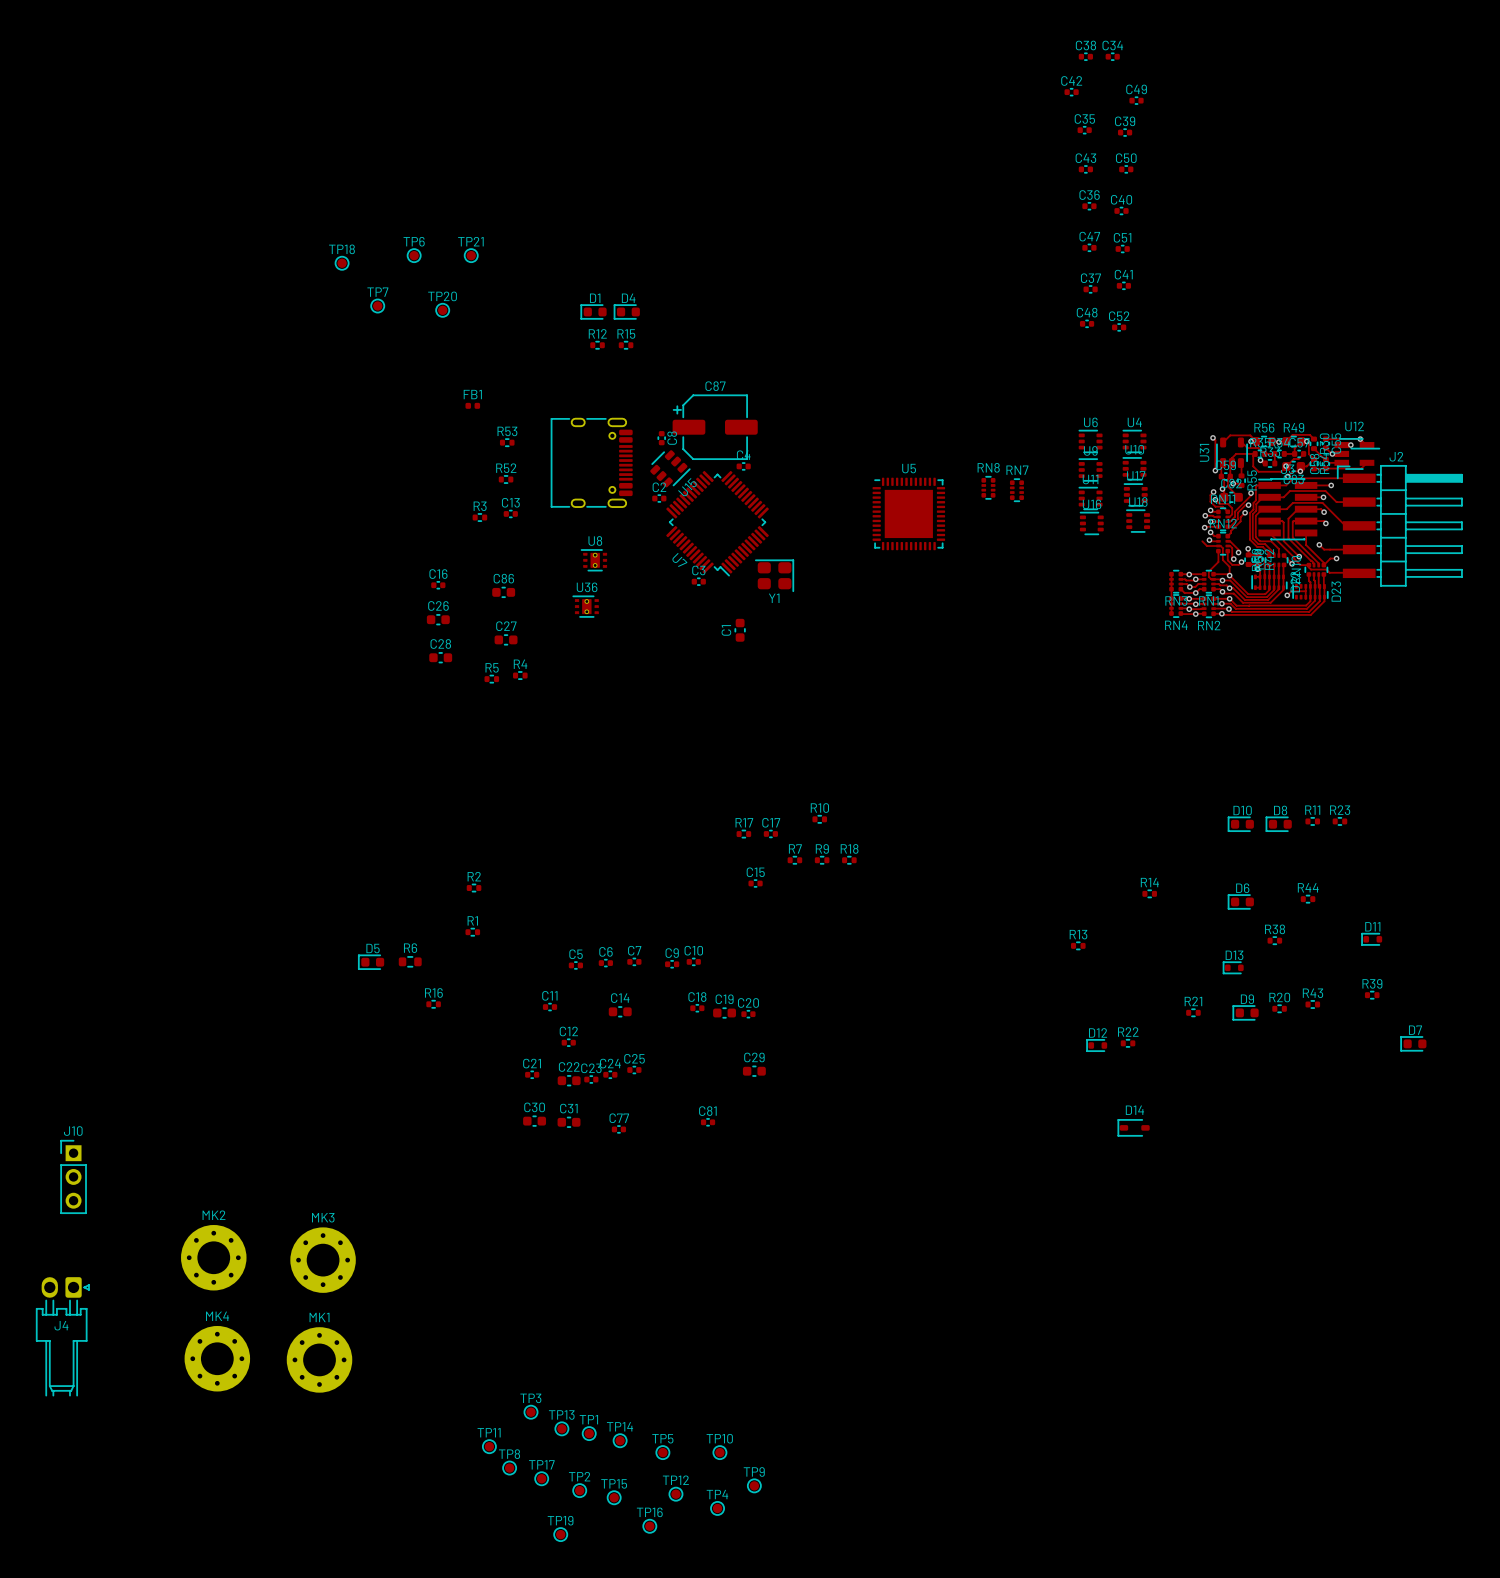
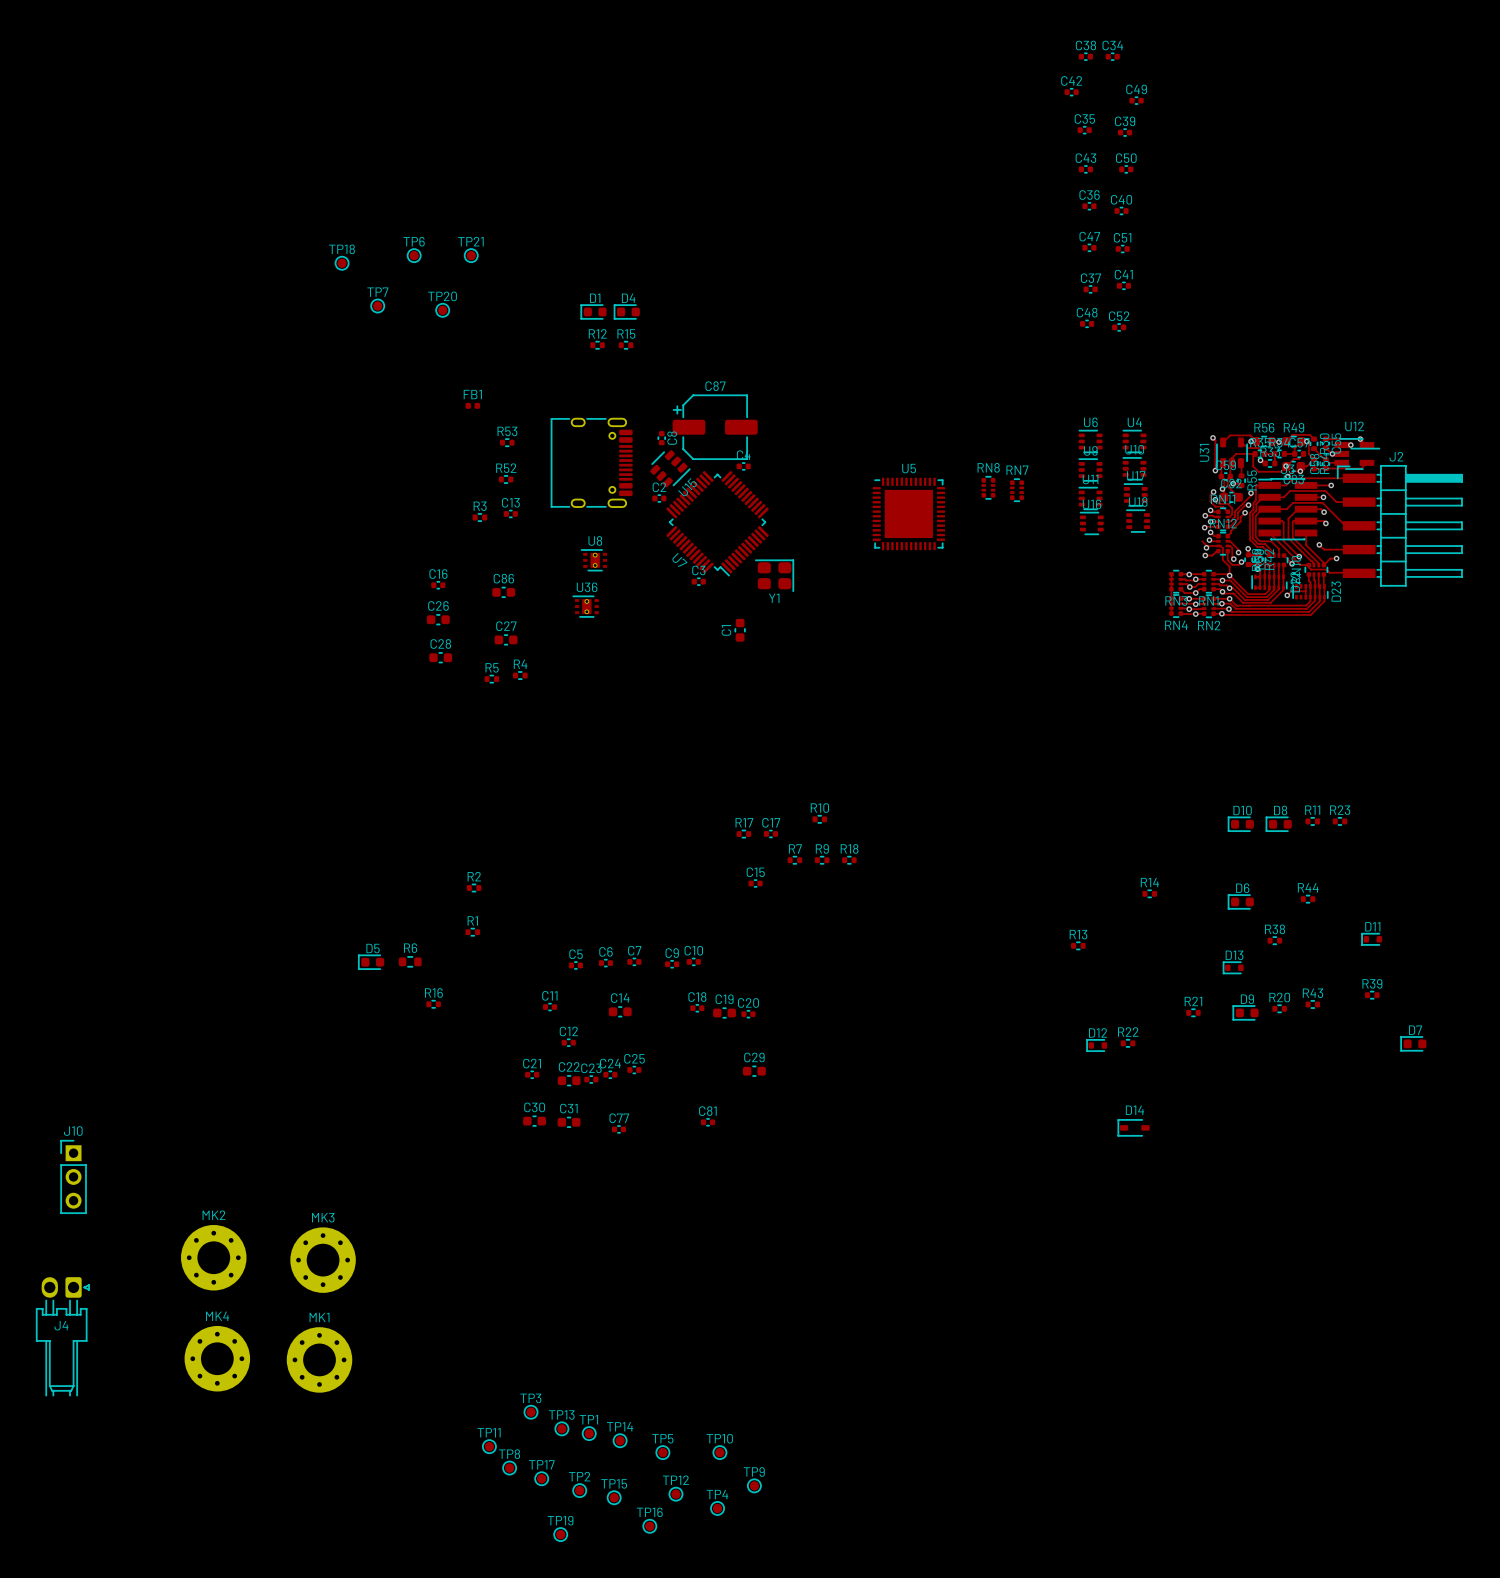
via: none -> (1206, 547)
track: none -> (1216, 551) (1212, 555) (1205, 555)
track: (1218, 551) (1218, 562) (1208, 571) (1208, 577) (1213, 579) -> none
via: none -> (1205, 555)

